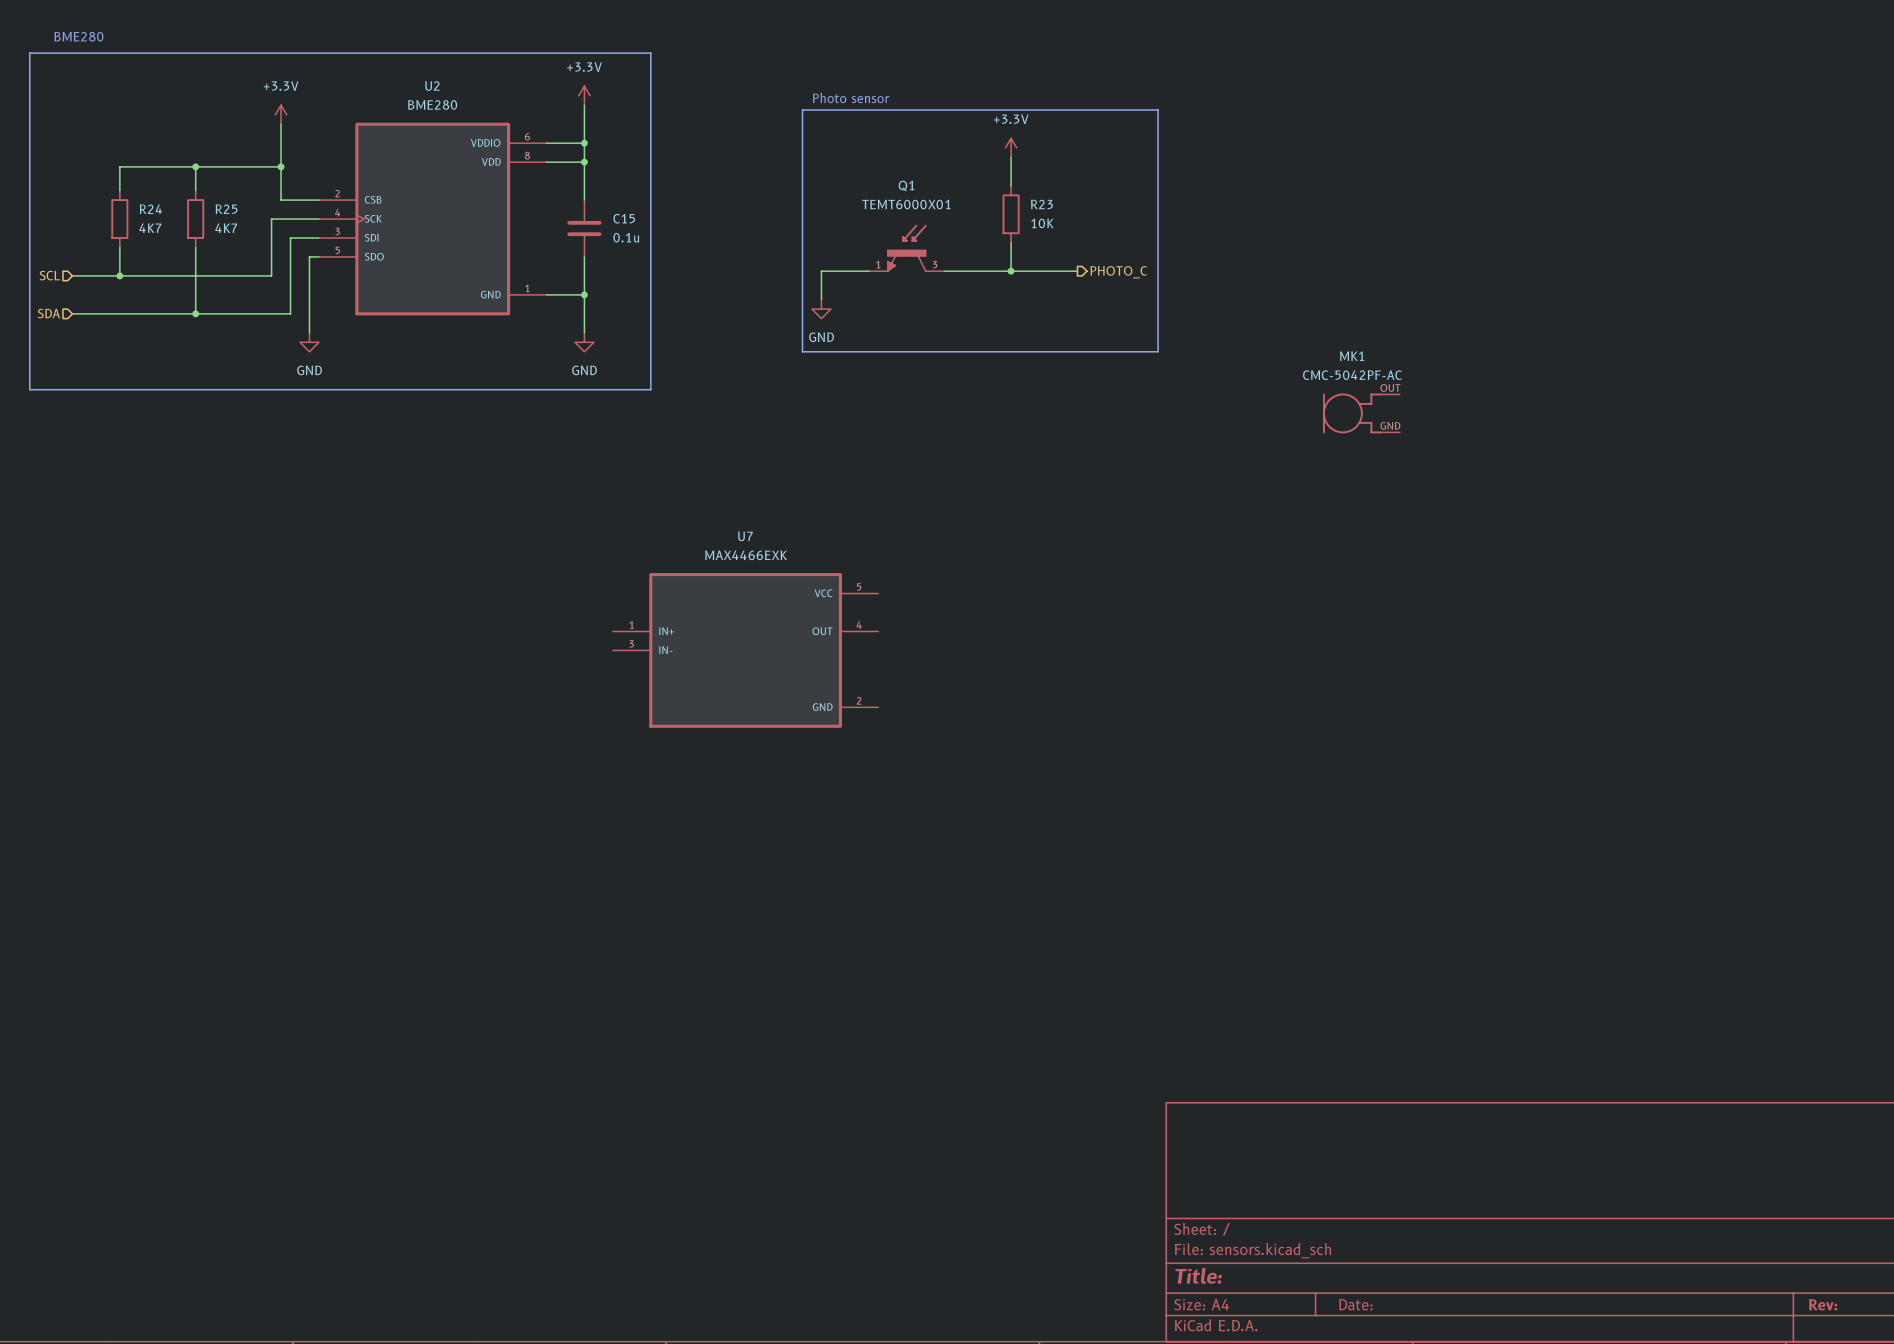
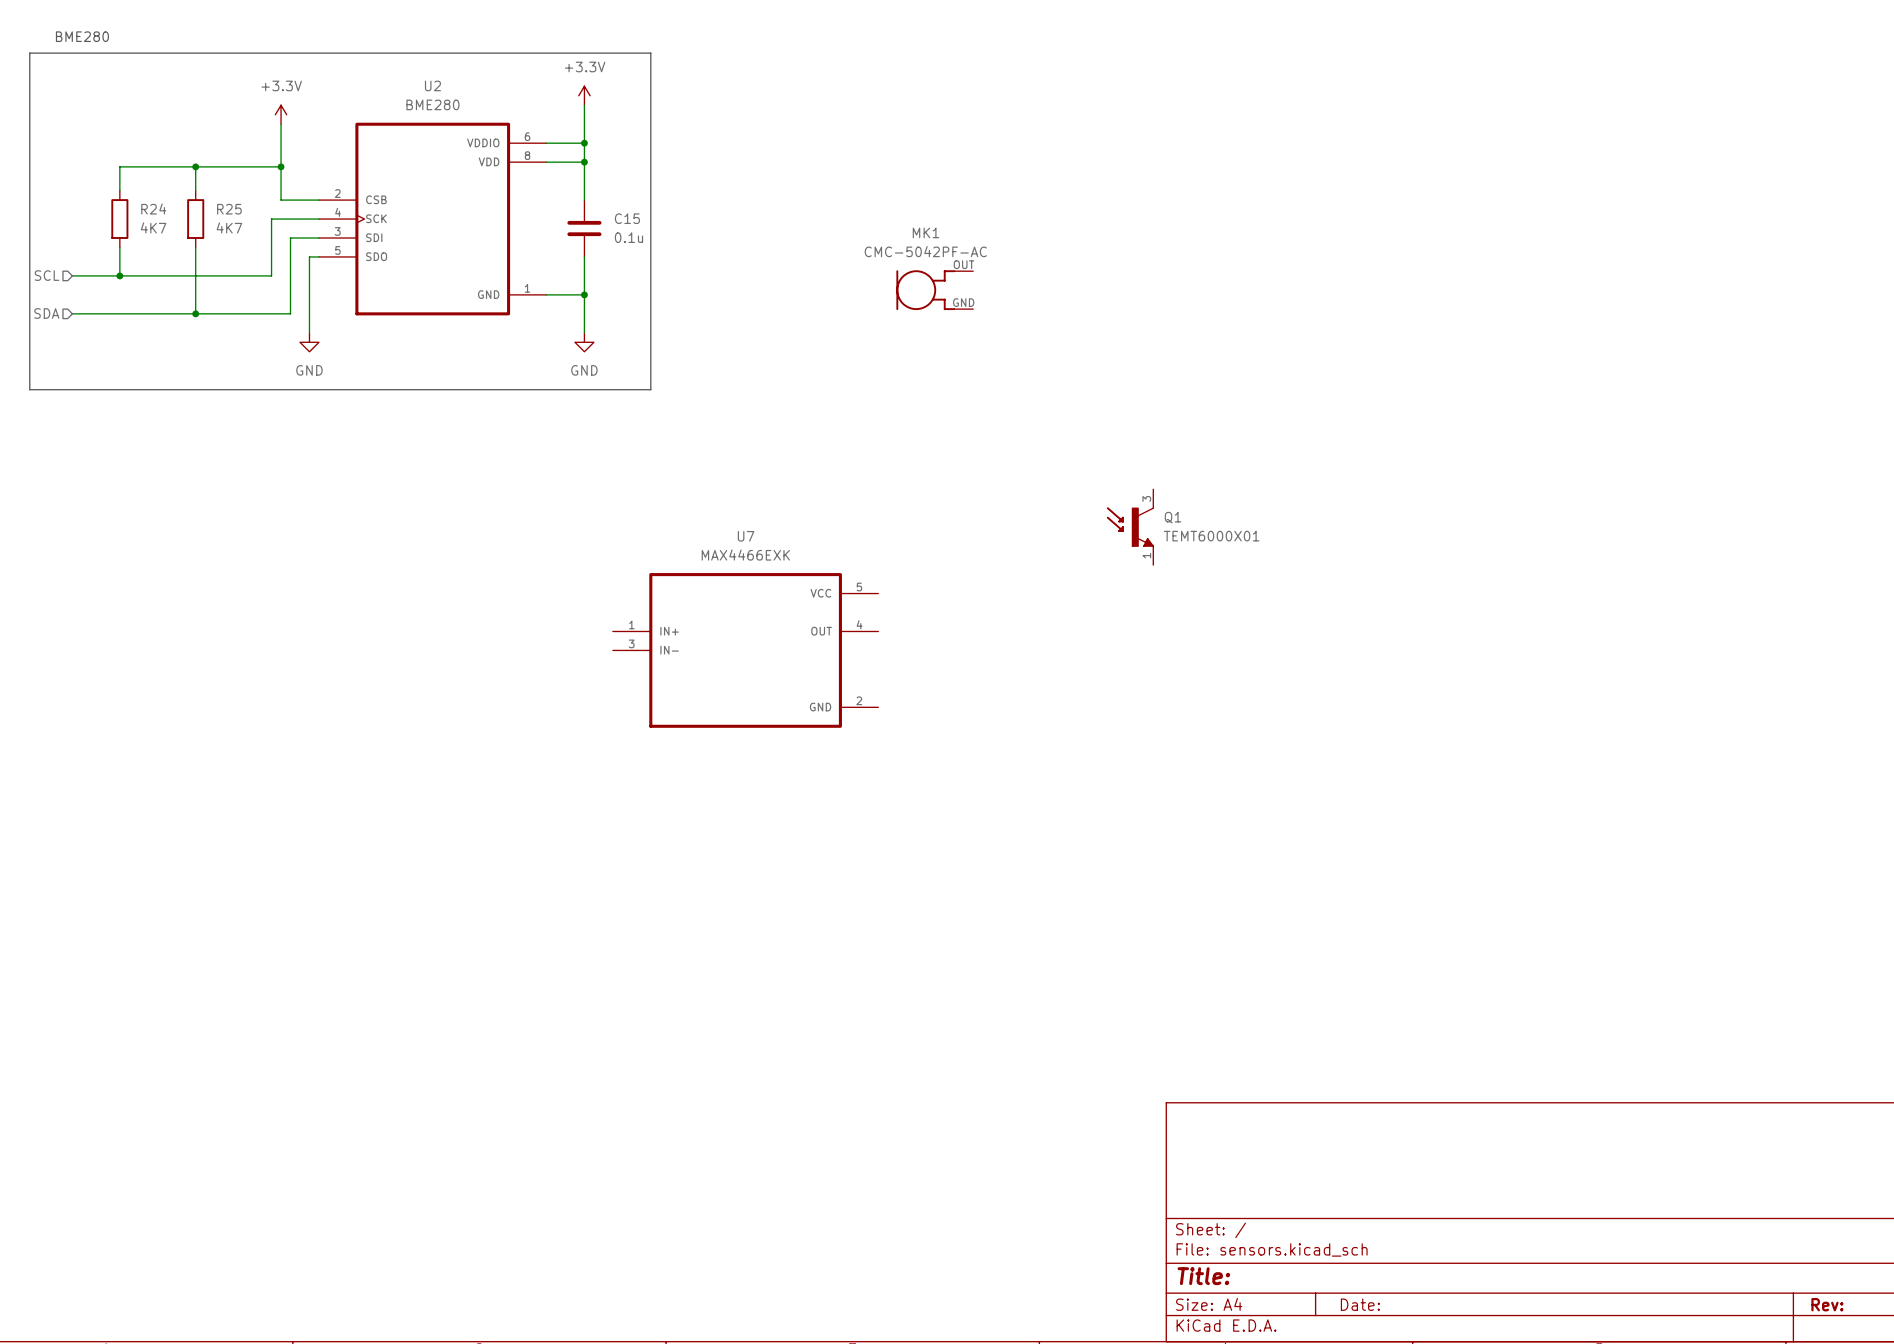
text: Photo sensor (851, 98) -> none
line: (802, 110) (1158, 110) (1158, 351) (802, 351) (802, 110) -> none
power symbol: +3.3V (1011, 147) -> none
wire: (1011, 157) (1011, 185) -> none
Q1 name position: Q1 (906, 185) -> Q1 (1173, 517)
Q1 value position: TEMT6000X01 (906, 204) -> TEMT6000X01 (1211, 536)
R23: 10K (1011, 214) -> none
wire: (1011, 242) (1011, 271) -> none
Q1 rotation: 0° (906, 248) -> 90° counterclockwise (1130, 526)
Q1 position: (906, 248) -> (1130, 527)
wire: (868, 271) (821, 271) (821, 299) -> none
wire: (944, 271) (1077, 271) -> none
junction: (1011, 271) -> none
hierarchical label: PHOTO_C (1118, 272) -> none
power symbol: GND (821, 309) -> none
MK1 position: (1361, 413) -> (934, 290)

